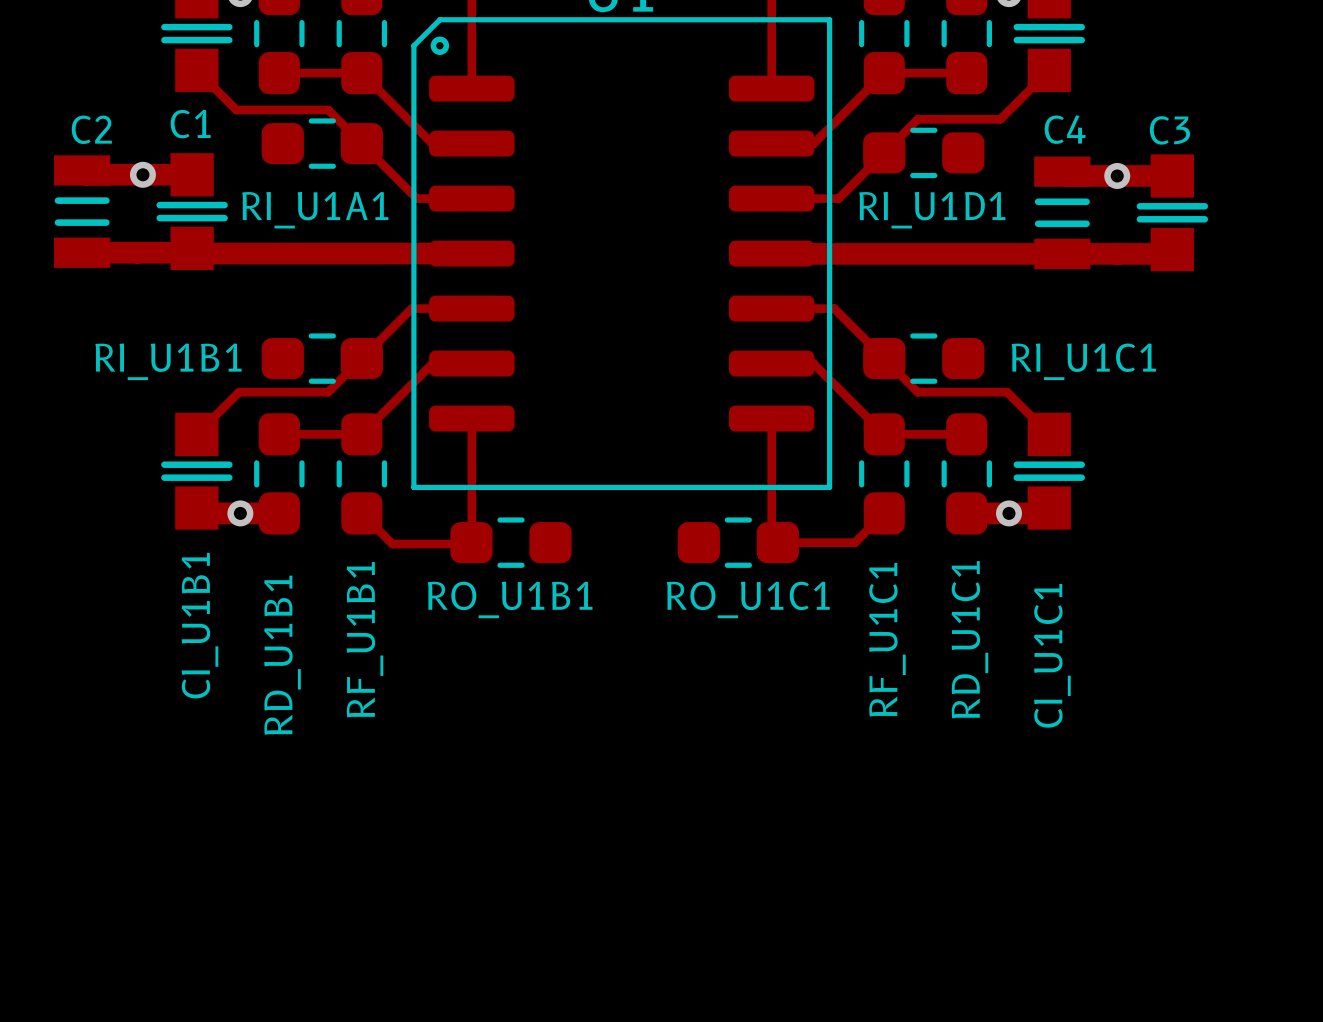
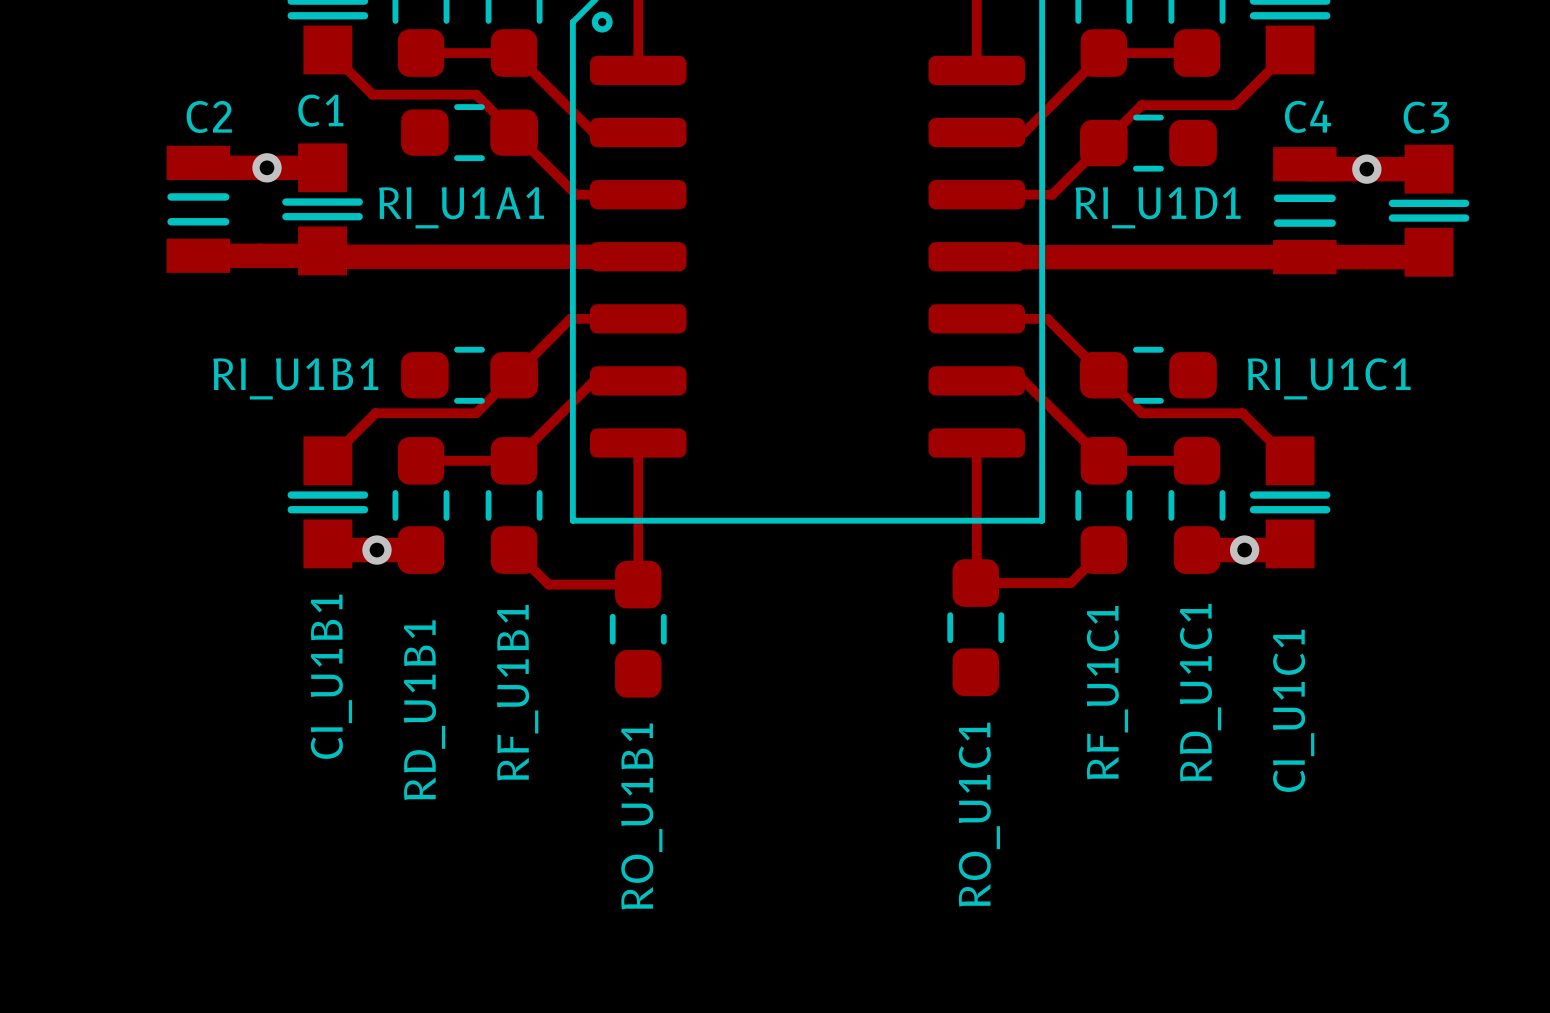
RO_U1B1 rotation: 0° (511, 542) -> 90° clockwise (638, 629)
RO_U1C1 rotation: 0° (738, 542) -> 90° clockwise (975, 627)
RO_U1B1 name position: RO_U1B1 (510, 599) -> RO_U1B1 (641, 816)
RO_U1C1 name position: RO_U1C1 (748, 599) -> RO_U1C1 (979, 814)

